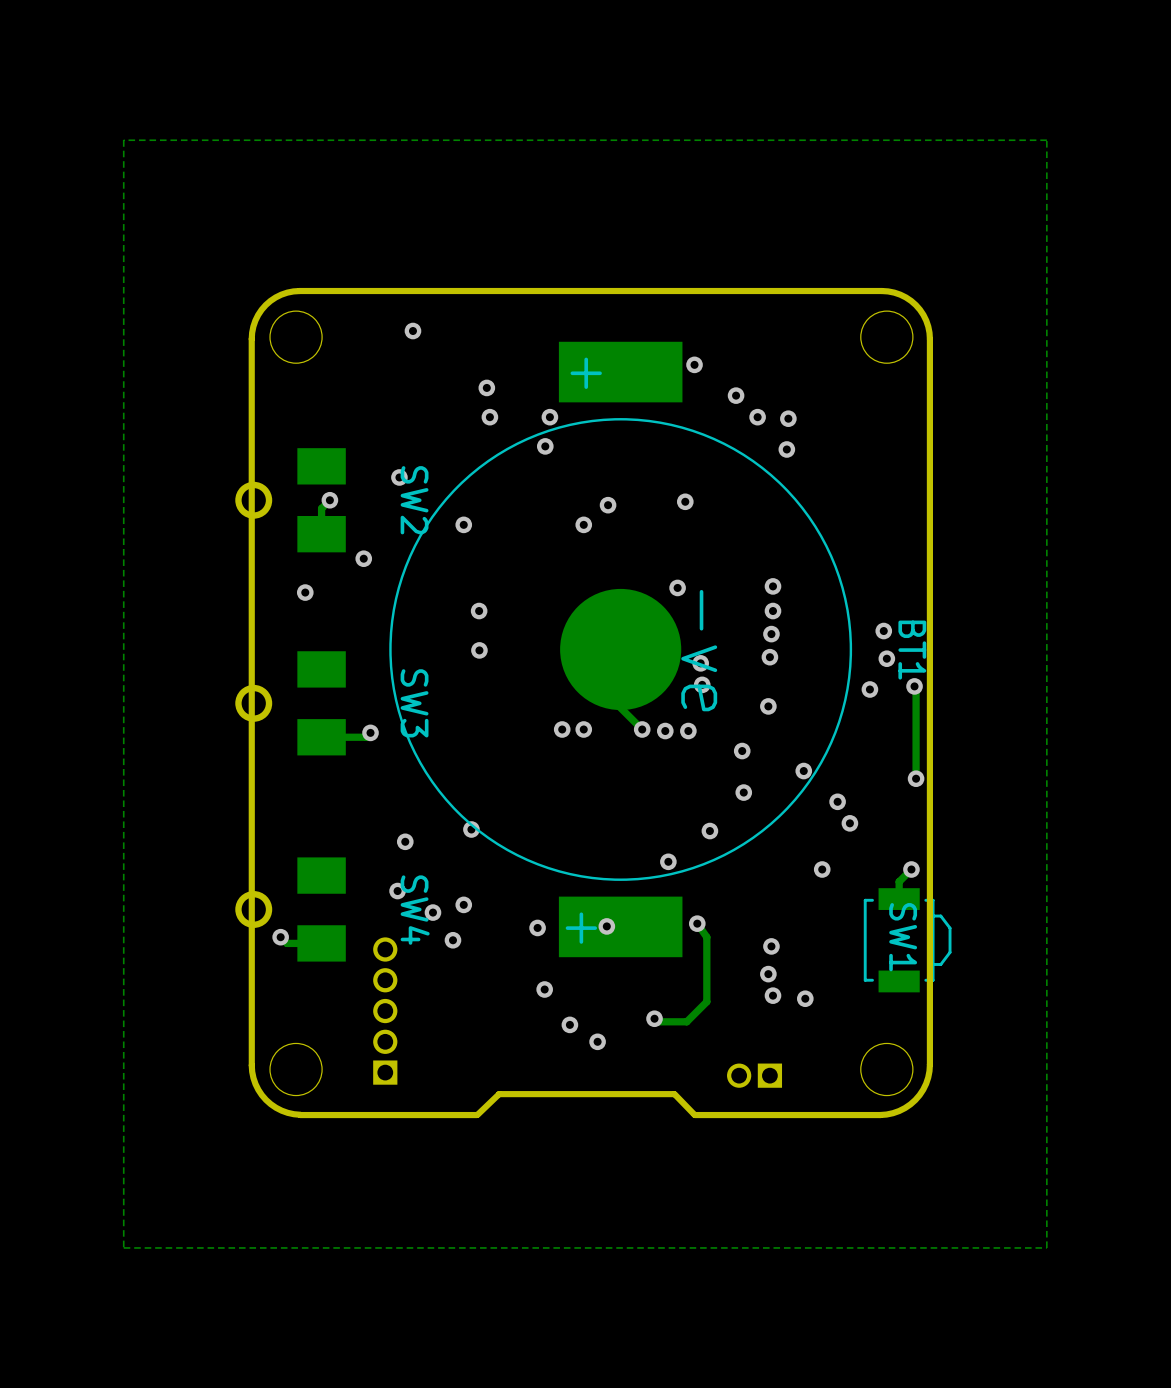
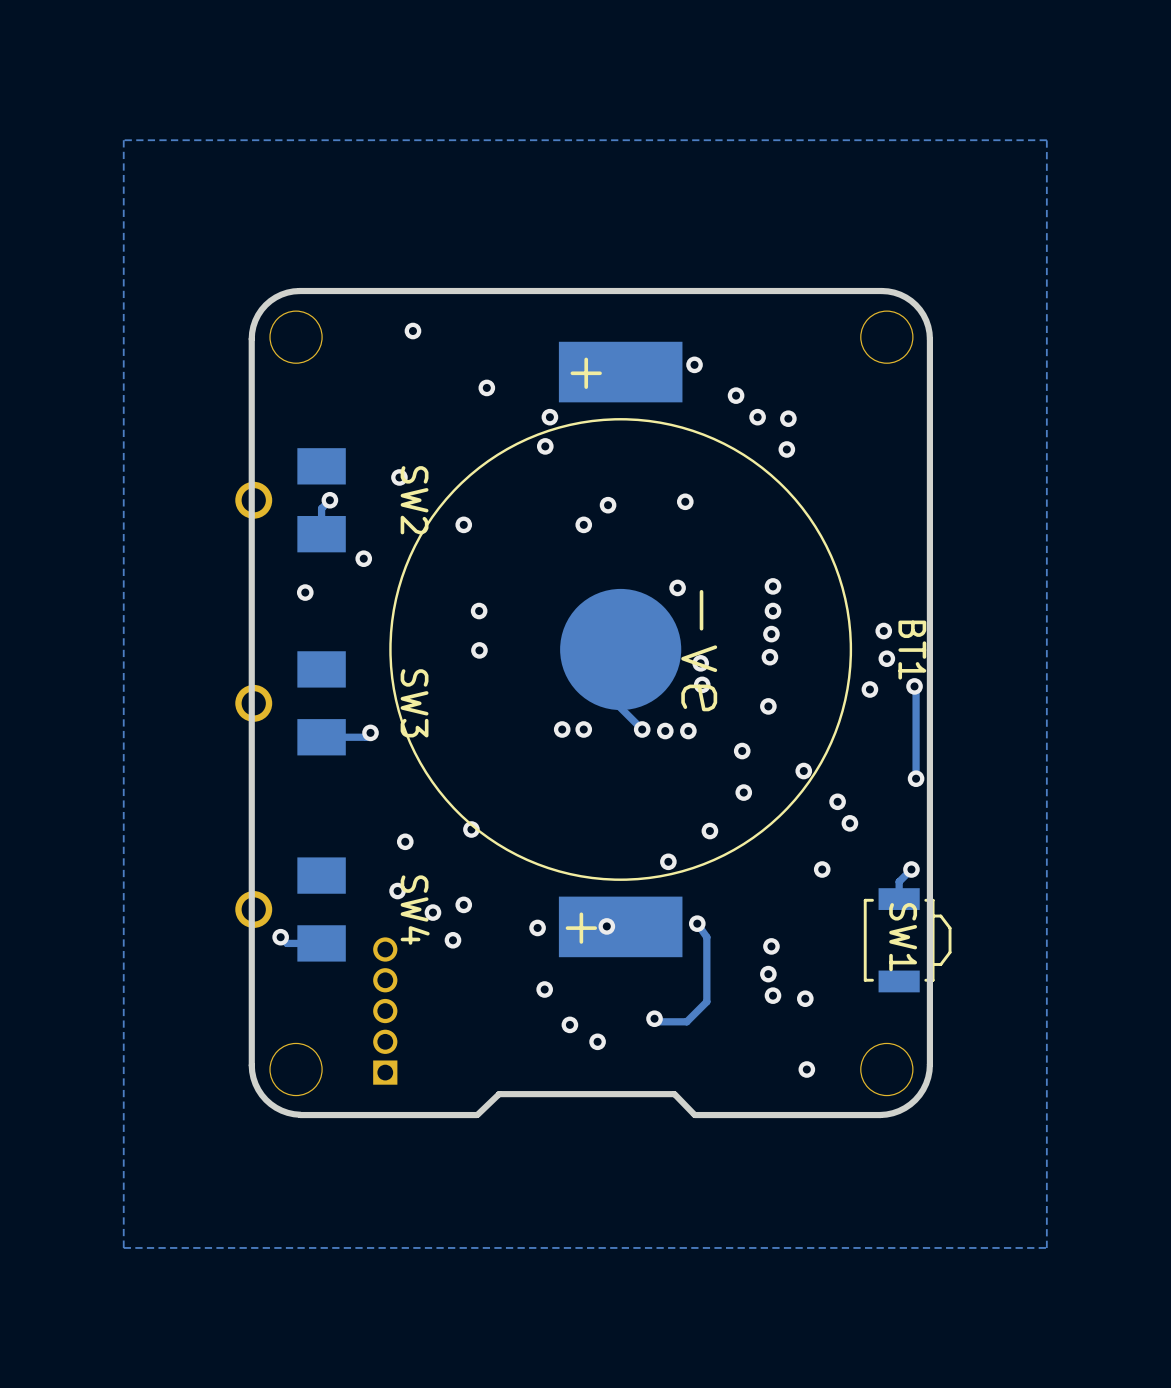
via: (489, 417) -> none
via: none -> (806, 1069)
part: (754, 1075) -> none

